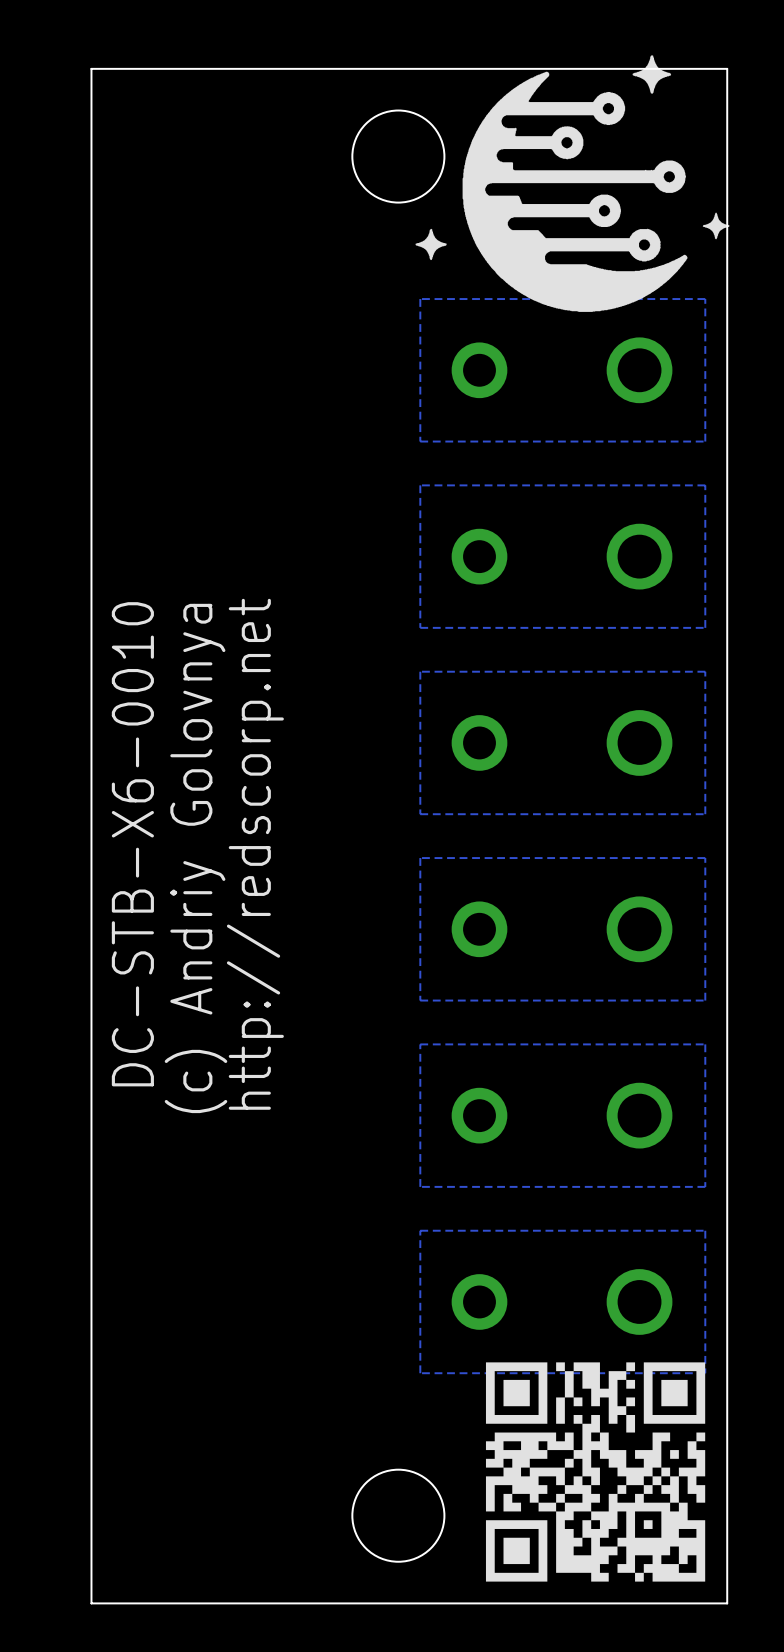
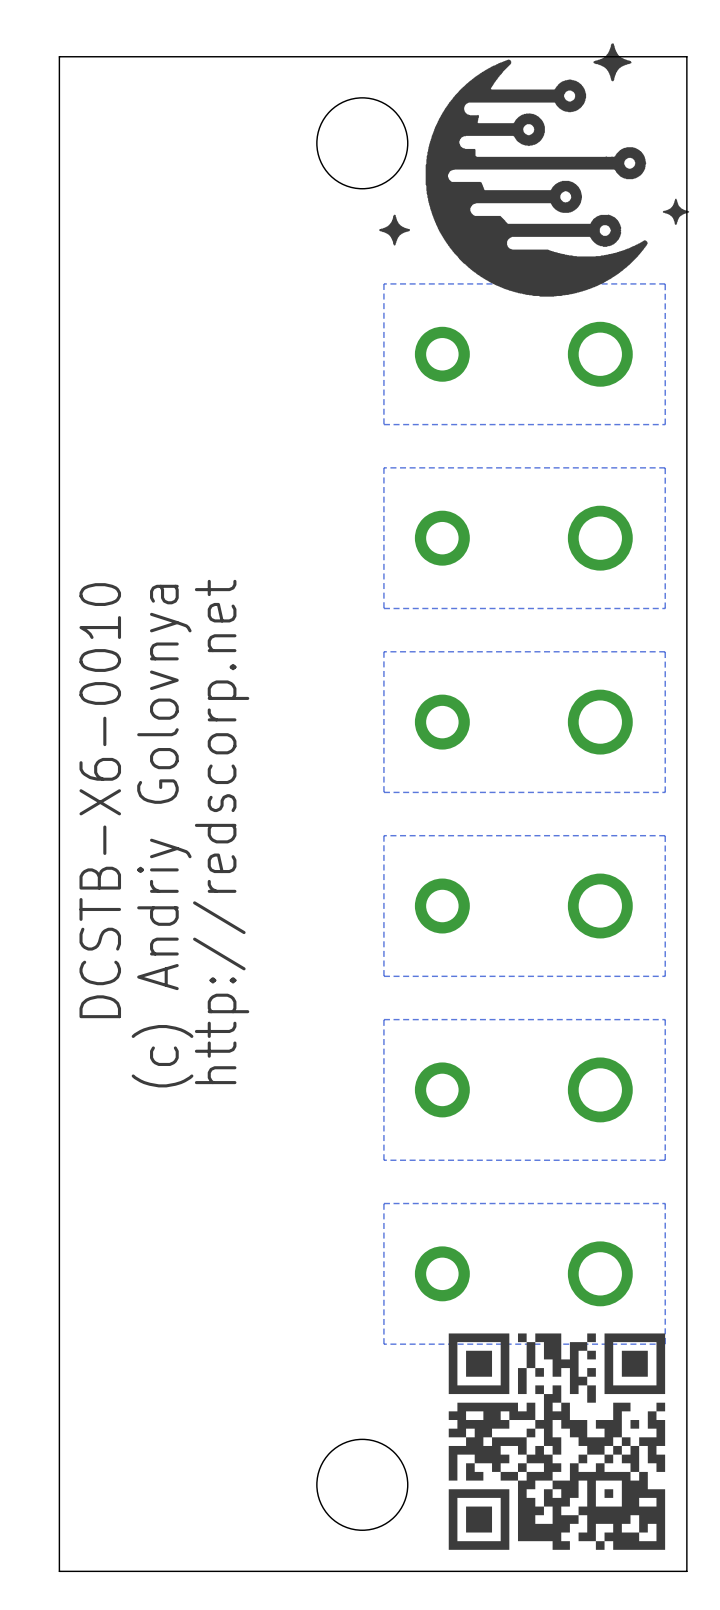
text: DC-STB-X6-0010 (132, 844) -> DCSTB-X6-0010 (100, 800)

